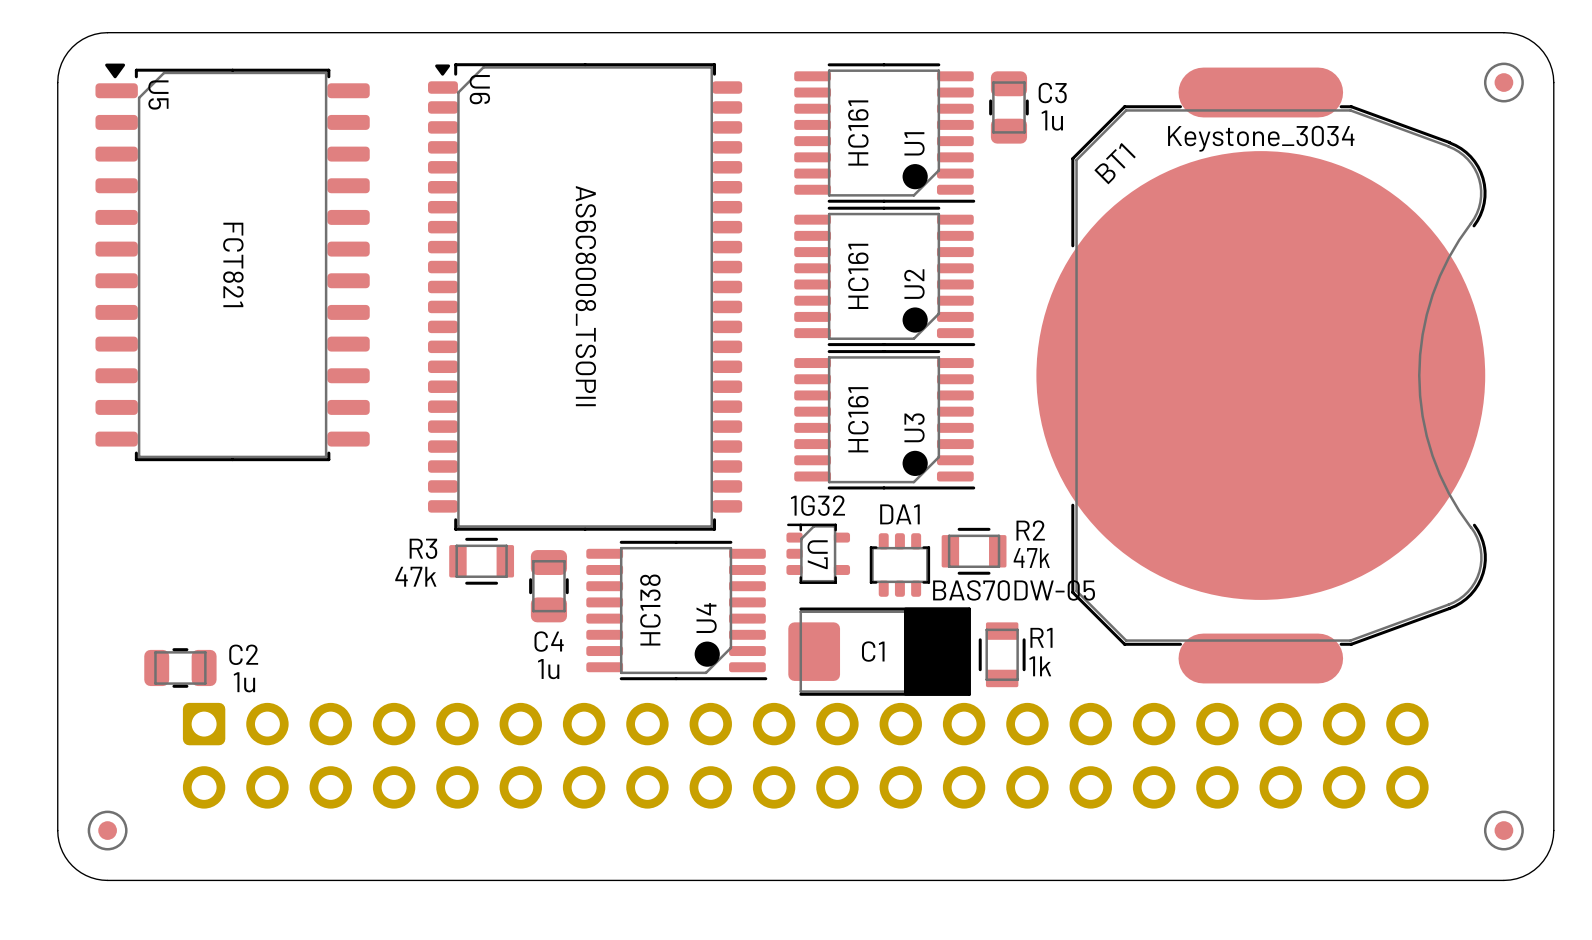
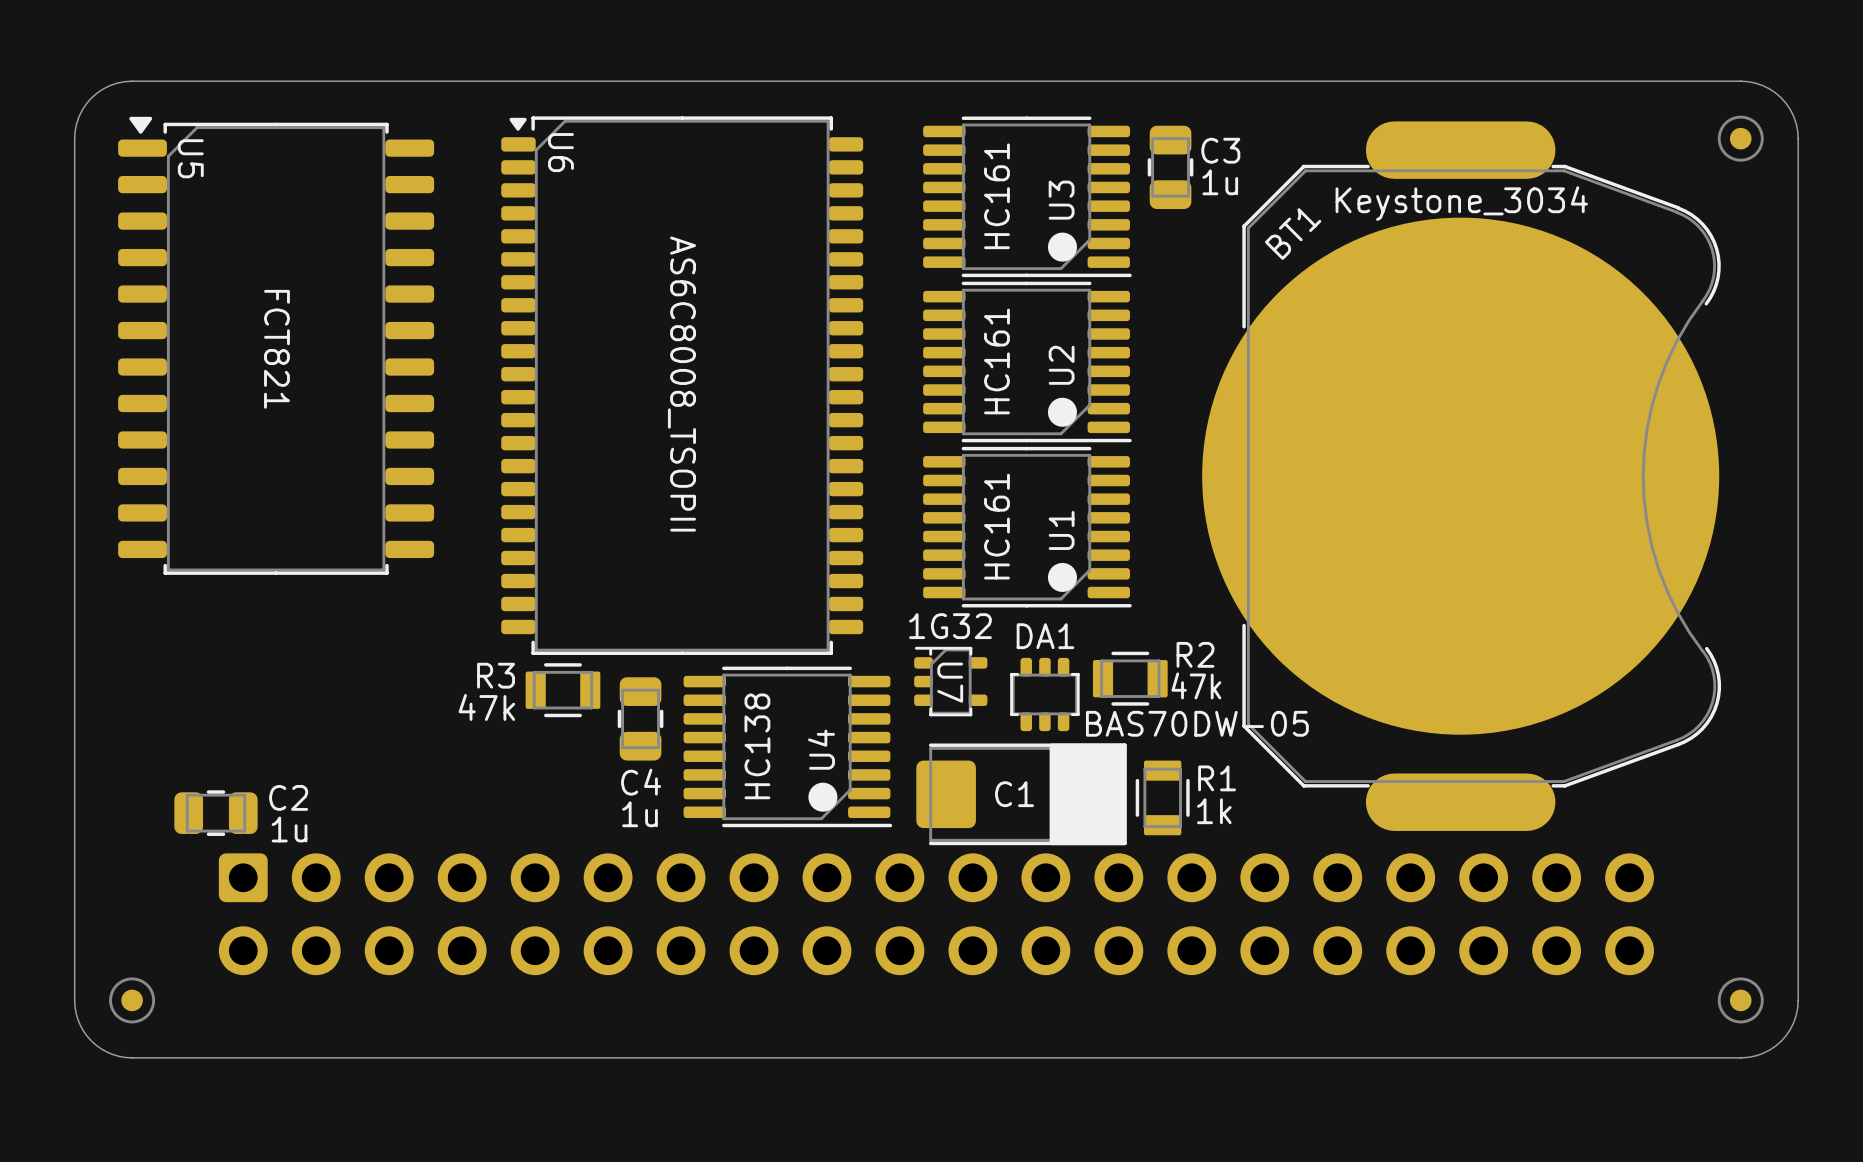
U1 name: U1 (914, 143) -> U3 (1061, 200)
U3 name: U3 (914, 427) -> U1 (1061, 530)

